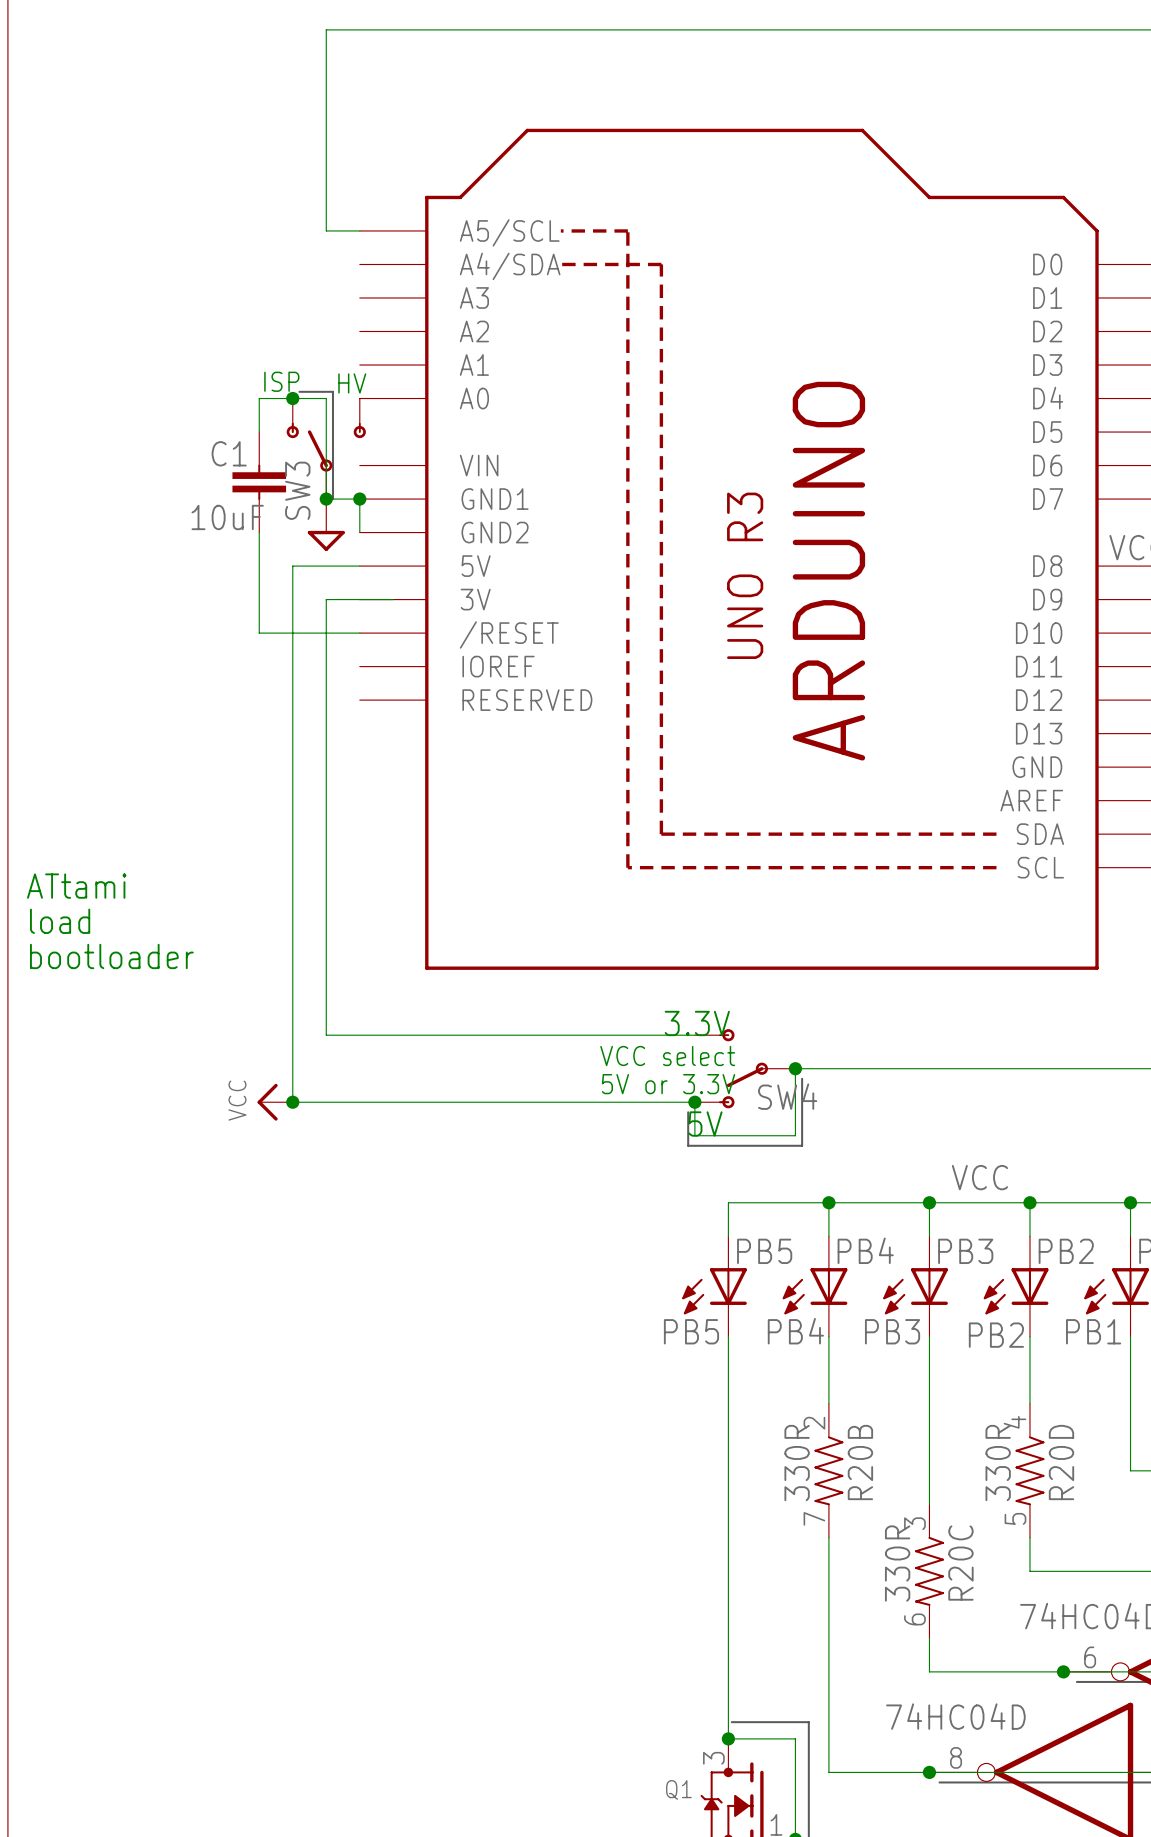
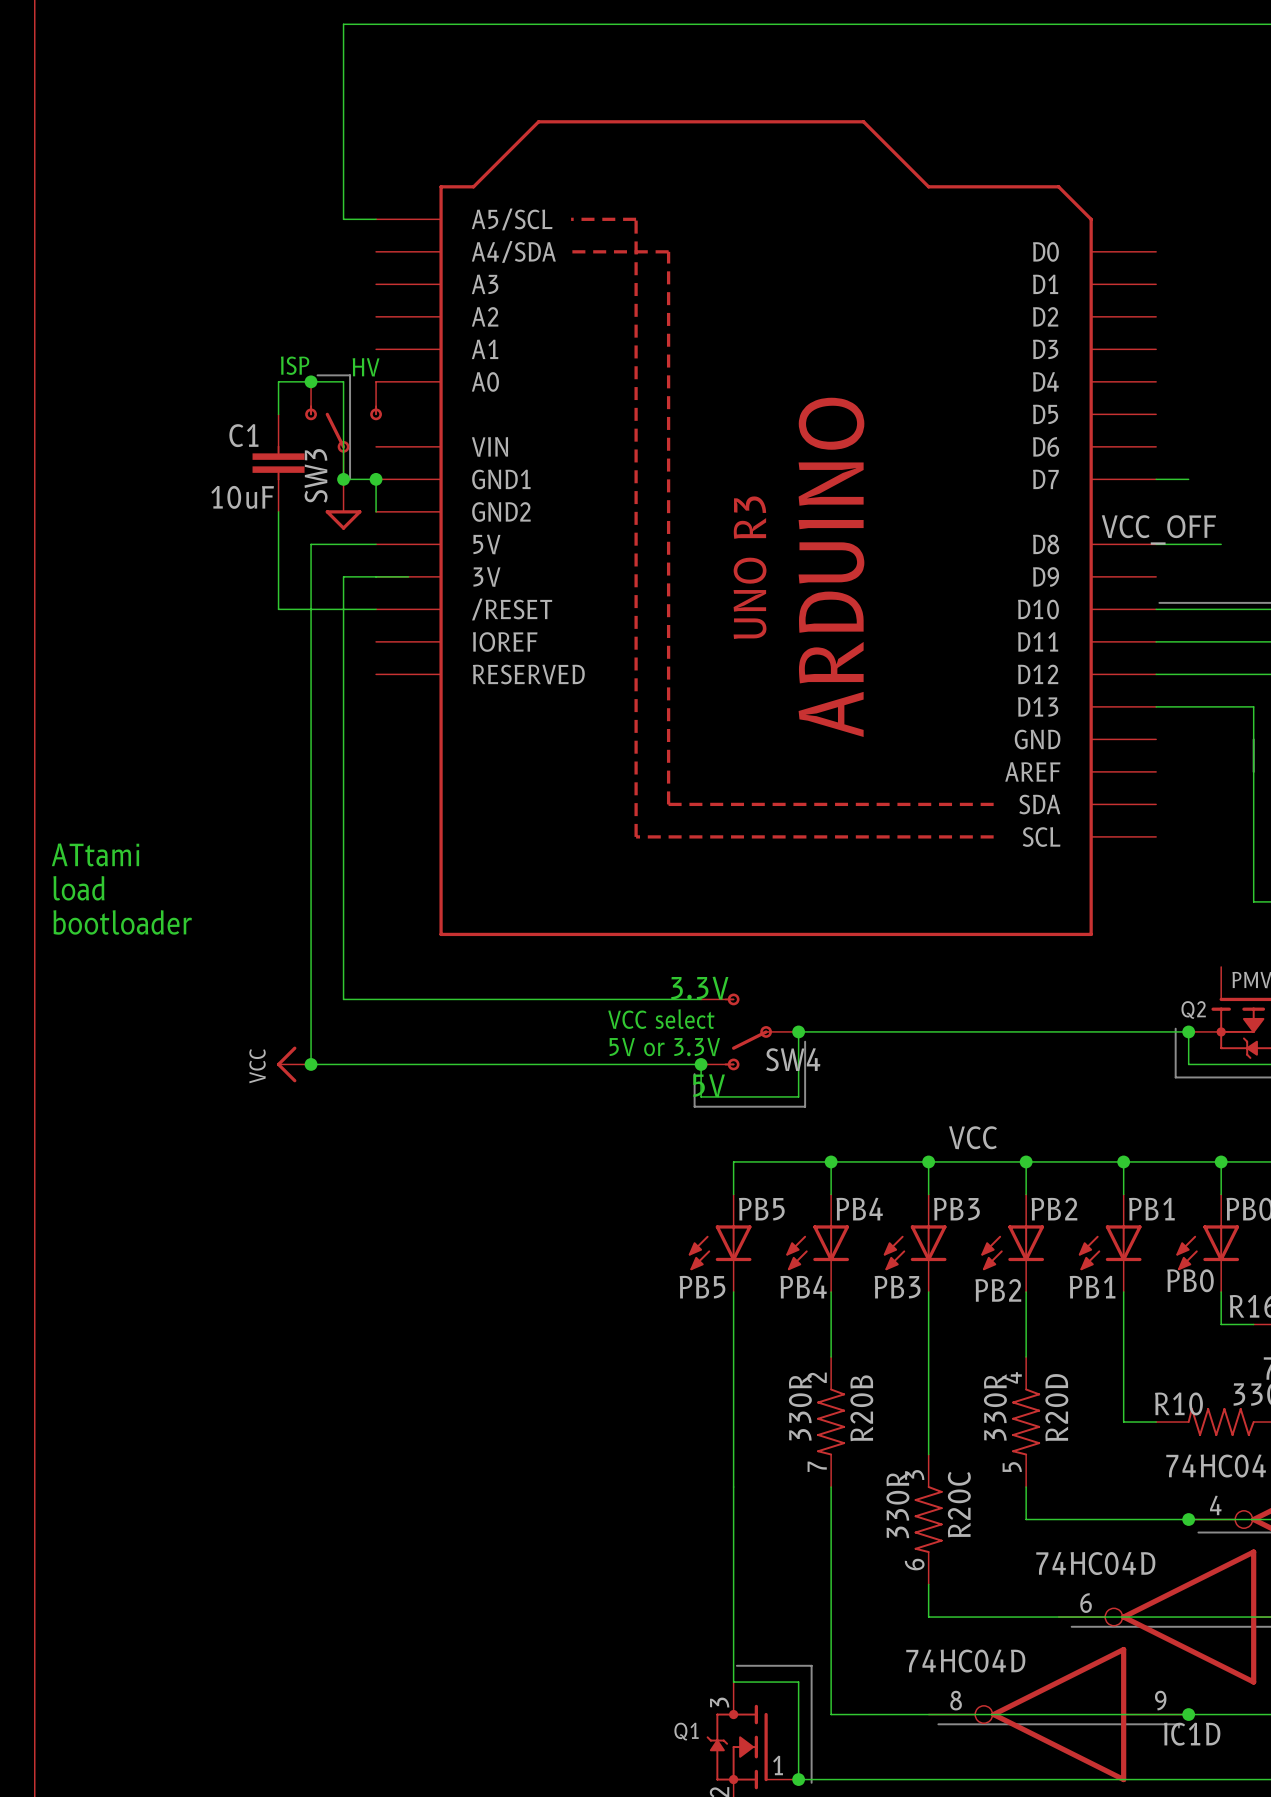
junction: (1063, 1671) -> none
junction: (728, 1738) -> none
junction: (929, 1772) -> none

